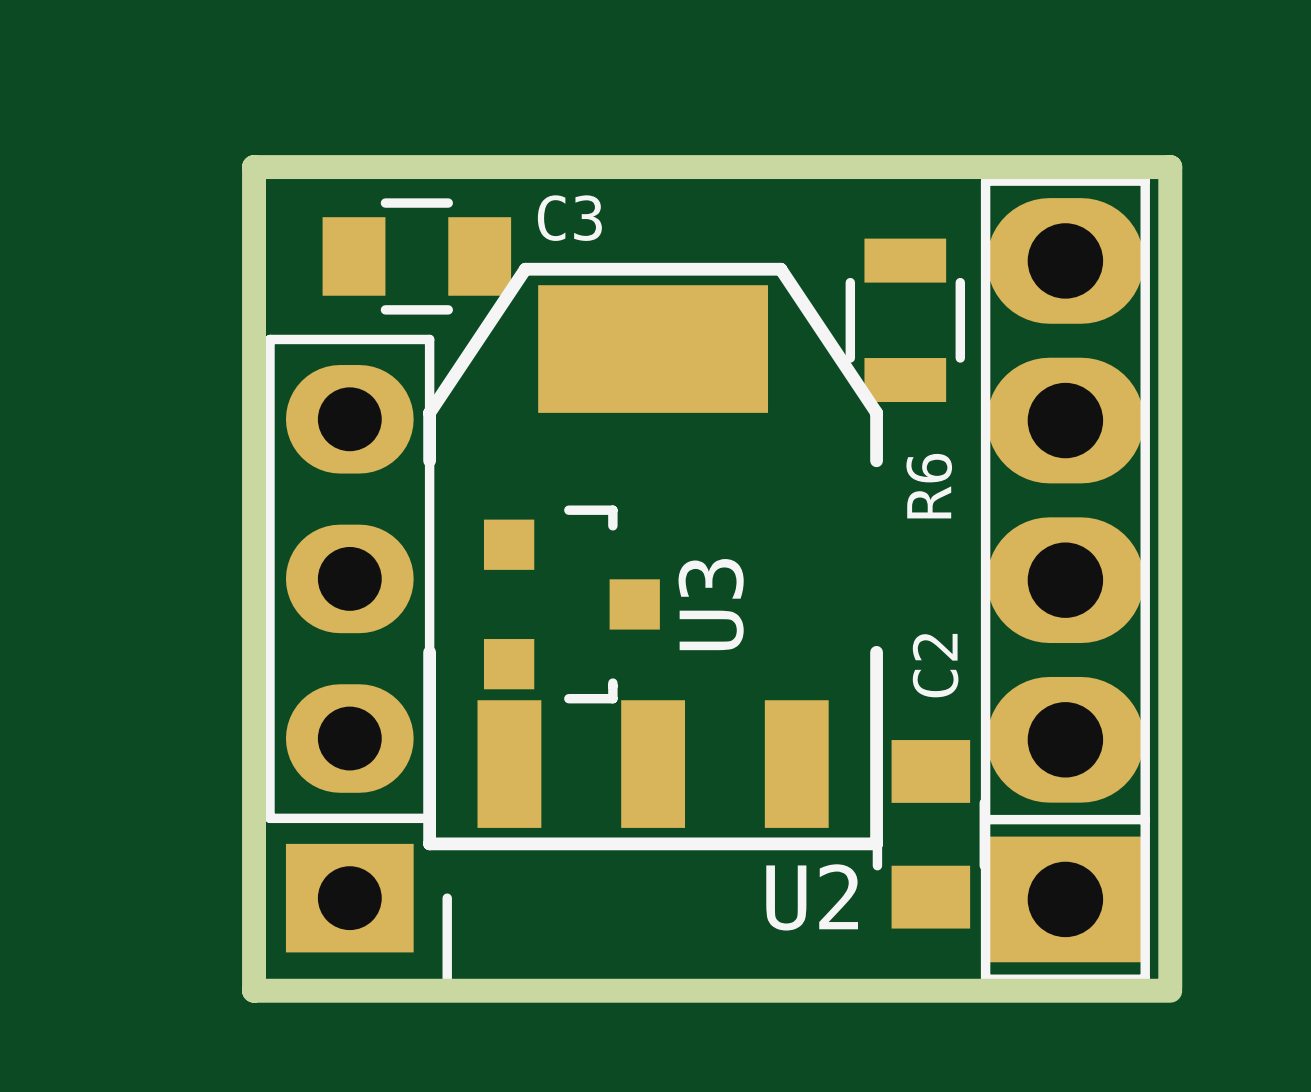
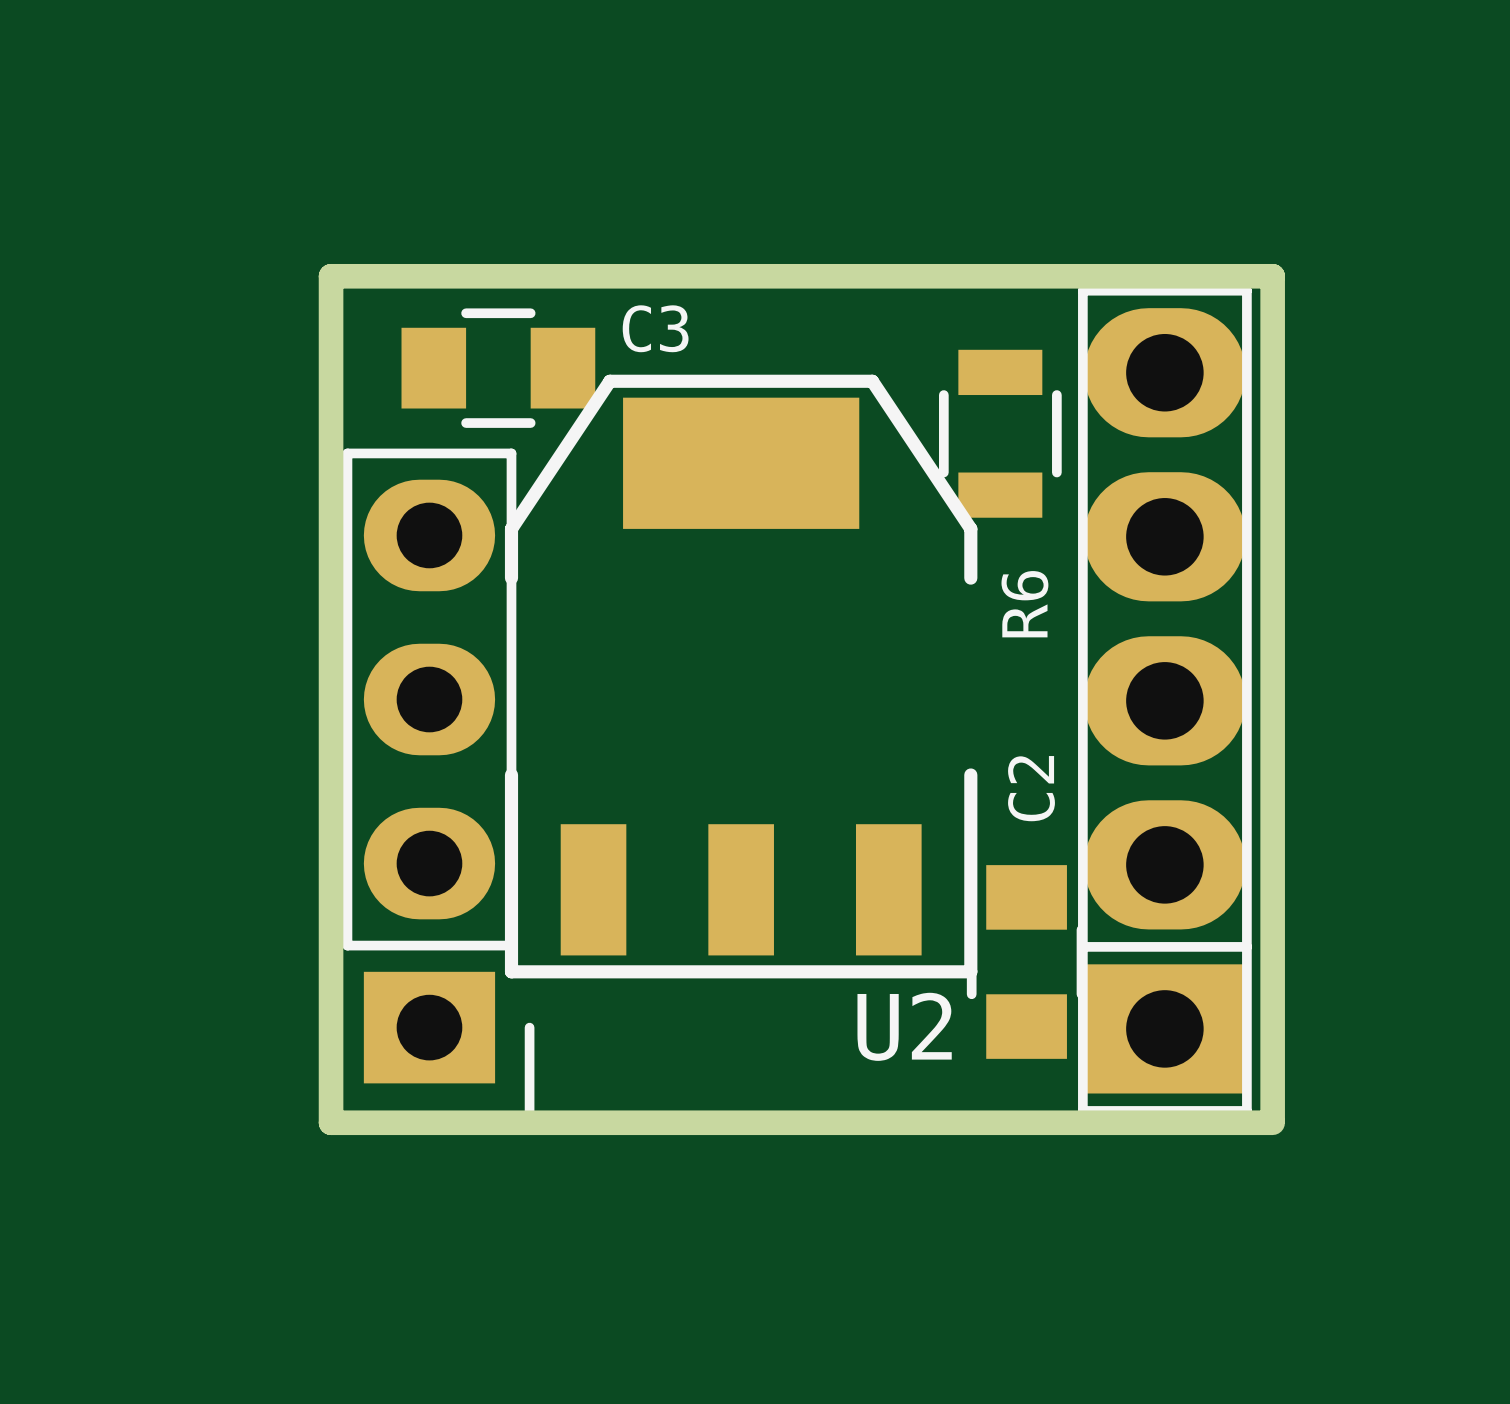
U3: (571, 604) -> none

